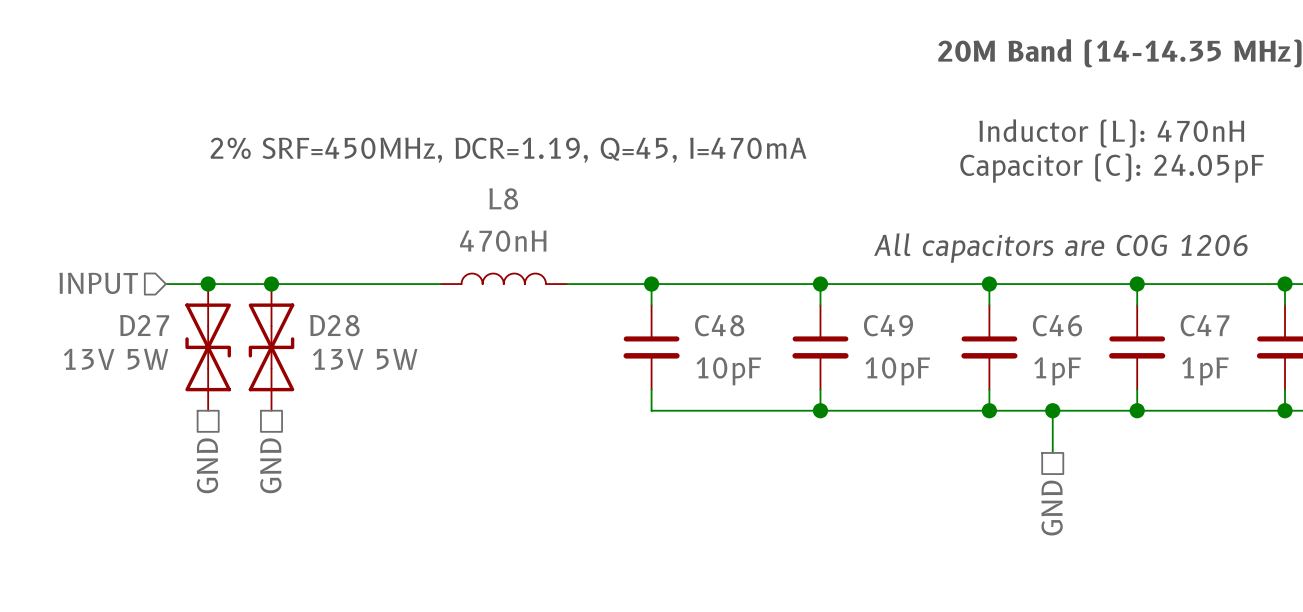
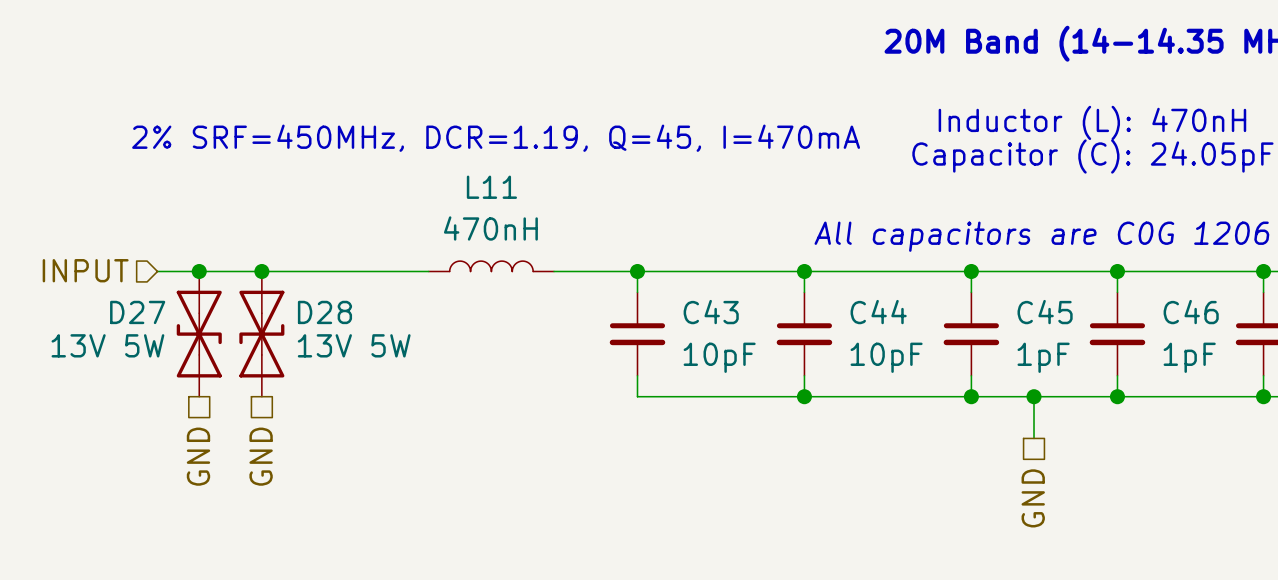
L8 name: L8 (503, 198) -> L11 (491, 187)
C48 name: C48 (719, 325) -> C43 (711, 312)
C49 name: C49 (888, 325) -> C44 (878, 312)
C46 name: C46 (1057, 325) -> C45 (1045, 312)
C47 name: C47 (1205, 325) -> C46 (1191, 312)

